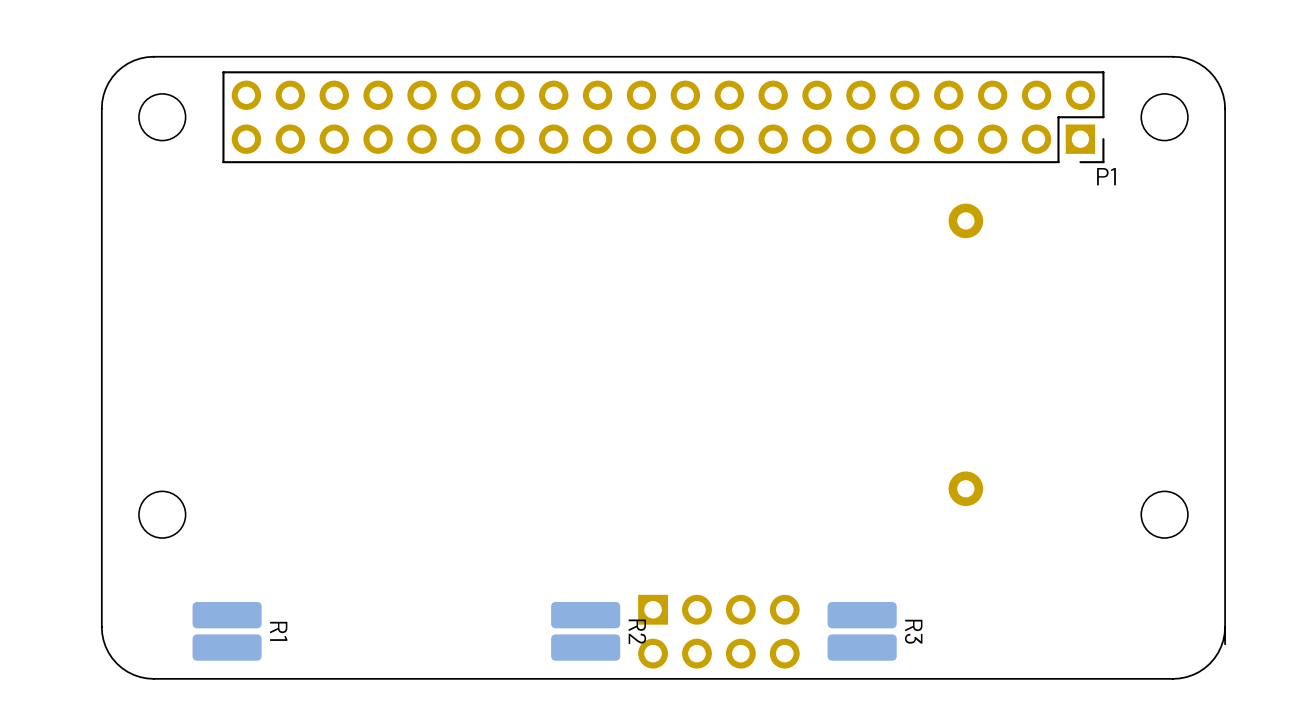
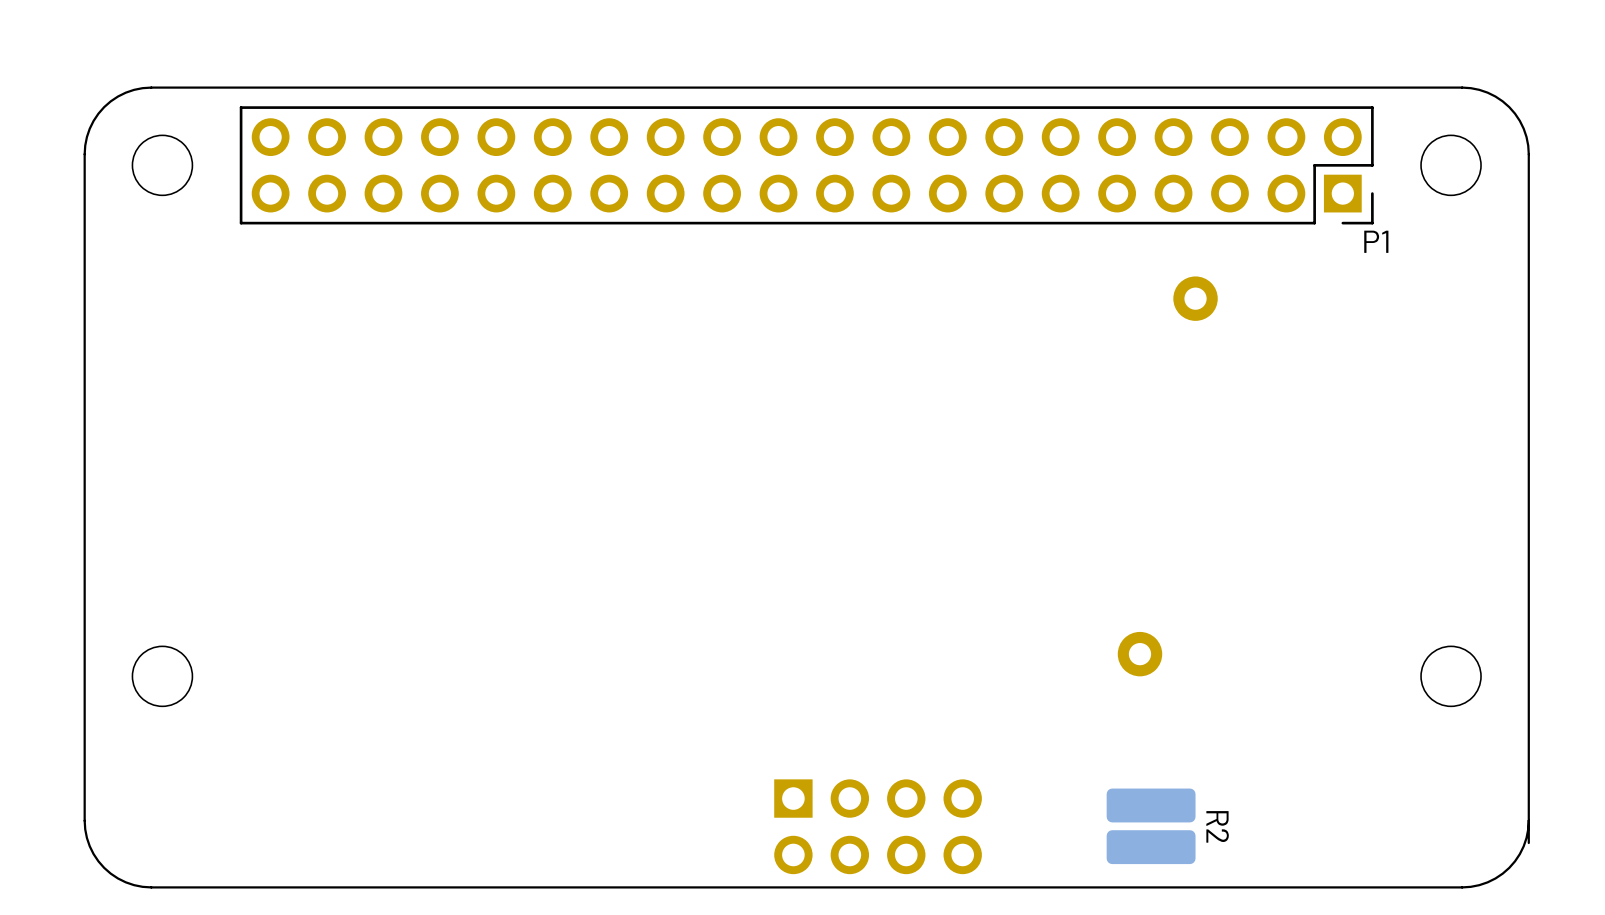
part position: (965, 488) -> (1139, 654)
R1: (227, 631) -> none
R2 position: (585, 631) -> (1151, 826)
R3: (862, 631) -> none

